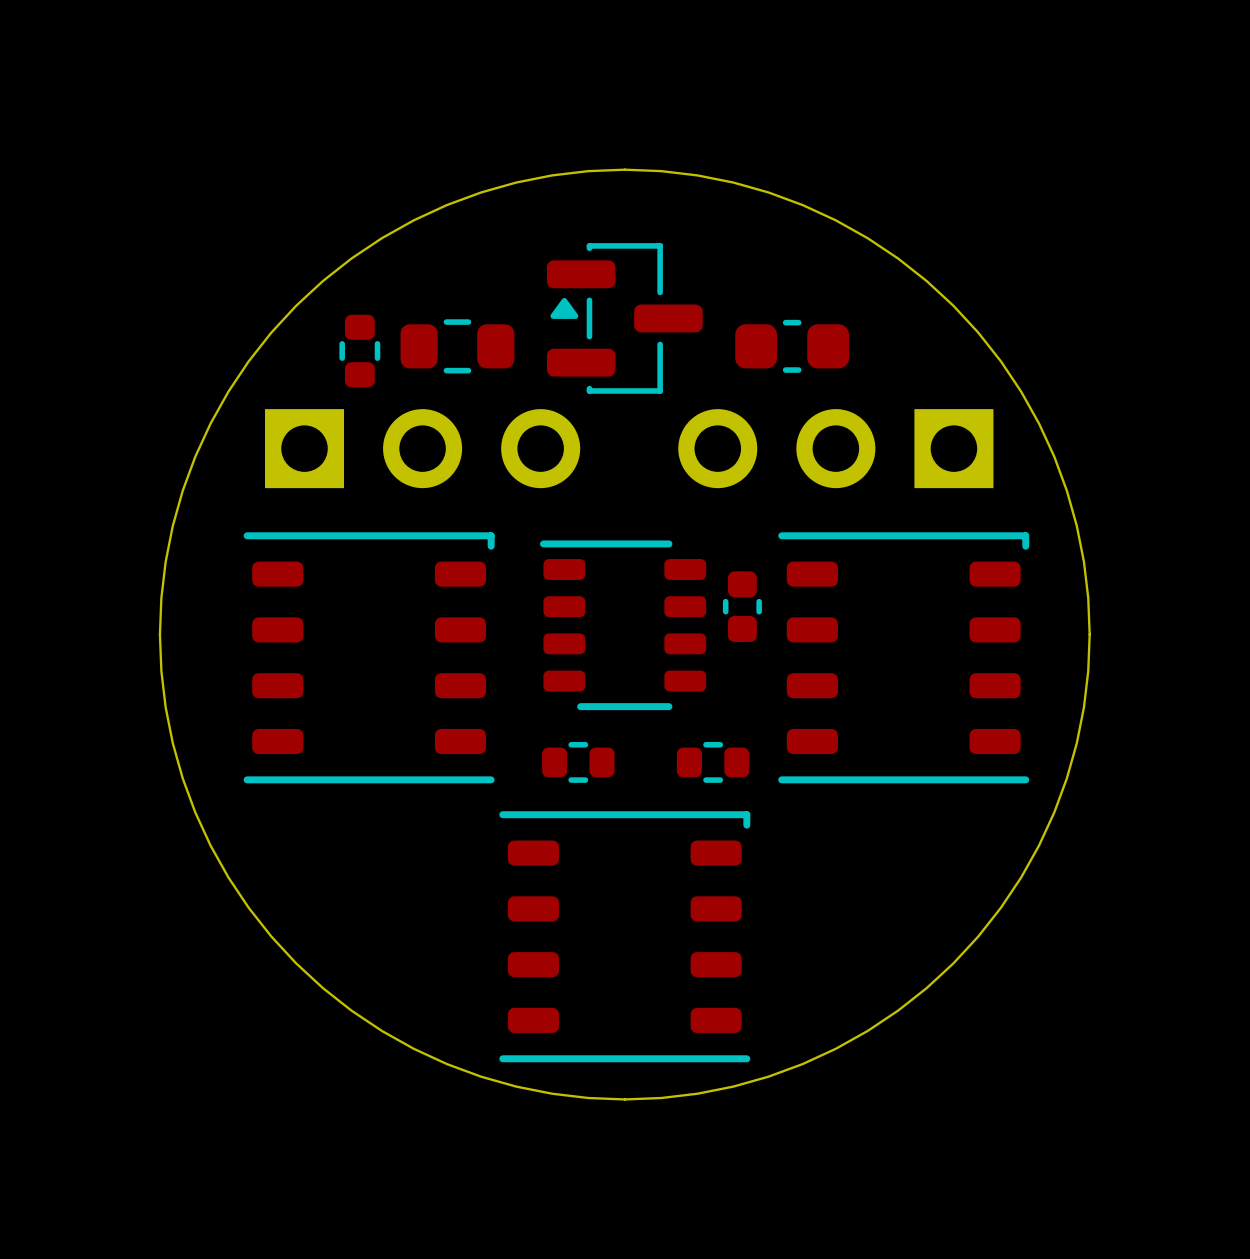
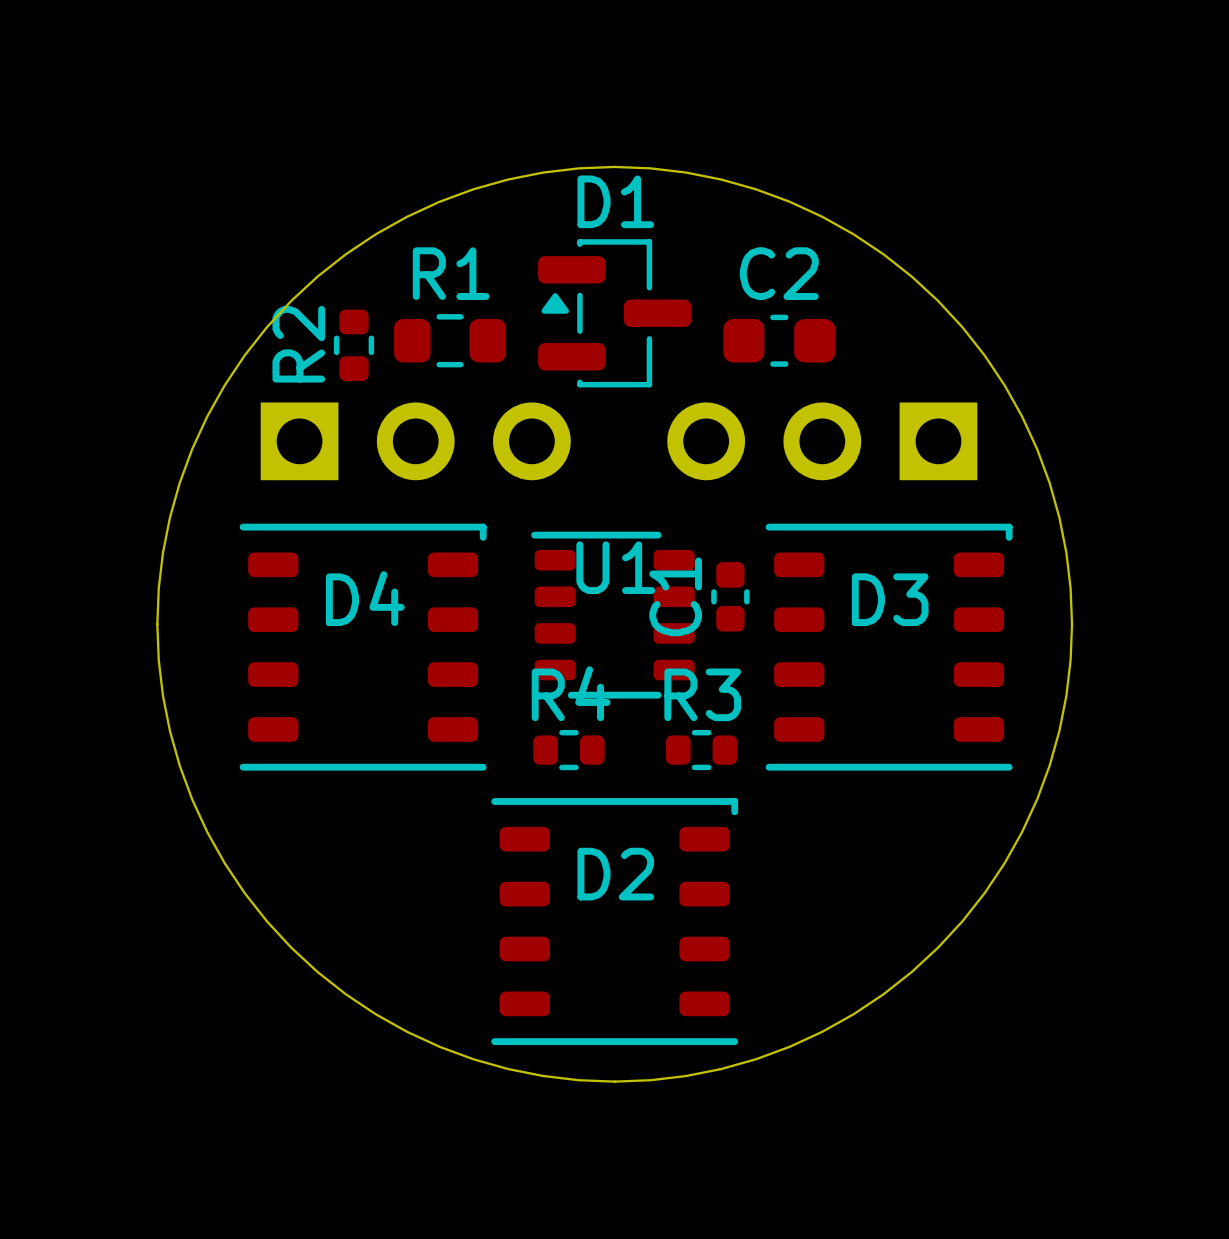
D1 name: none -> D1 (615, 201)
R1 name: none -> R1 (451, 273)
C2 name: none -> C2 (779, 273)
R2 name: none -> R2 (298, 344)
U1 name: none -> U1 (615, 567)
C1 name: none -> C1 (675, 596)
D4 name: none -> D4 (365, 598)
D3 name: none -> D3 (890, 599)
R4 name: none -> R4 (571, 693)
R3 name: none -> R3 (702, 694)
D2 name: none -> D2 (615, 874)

